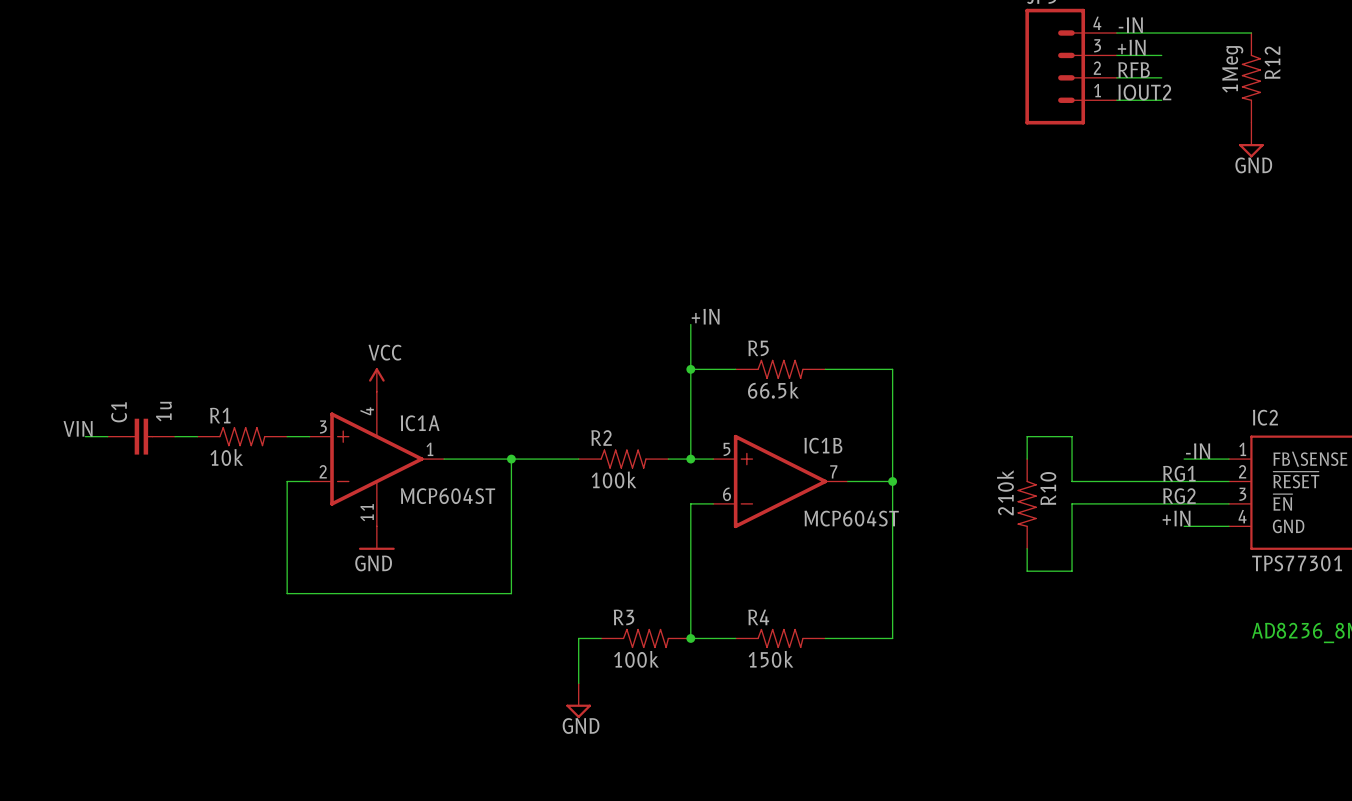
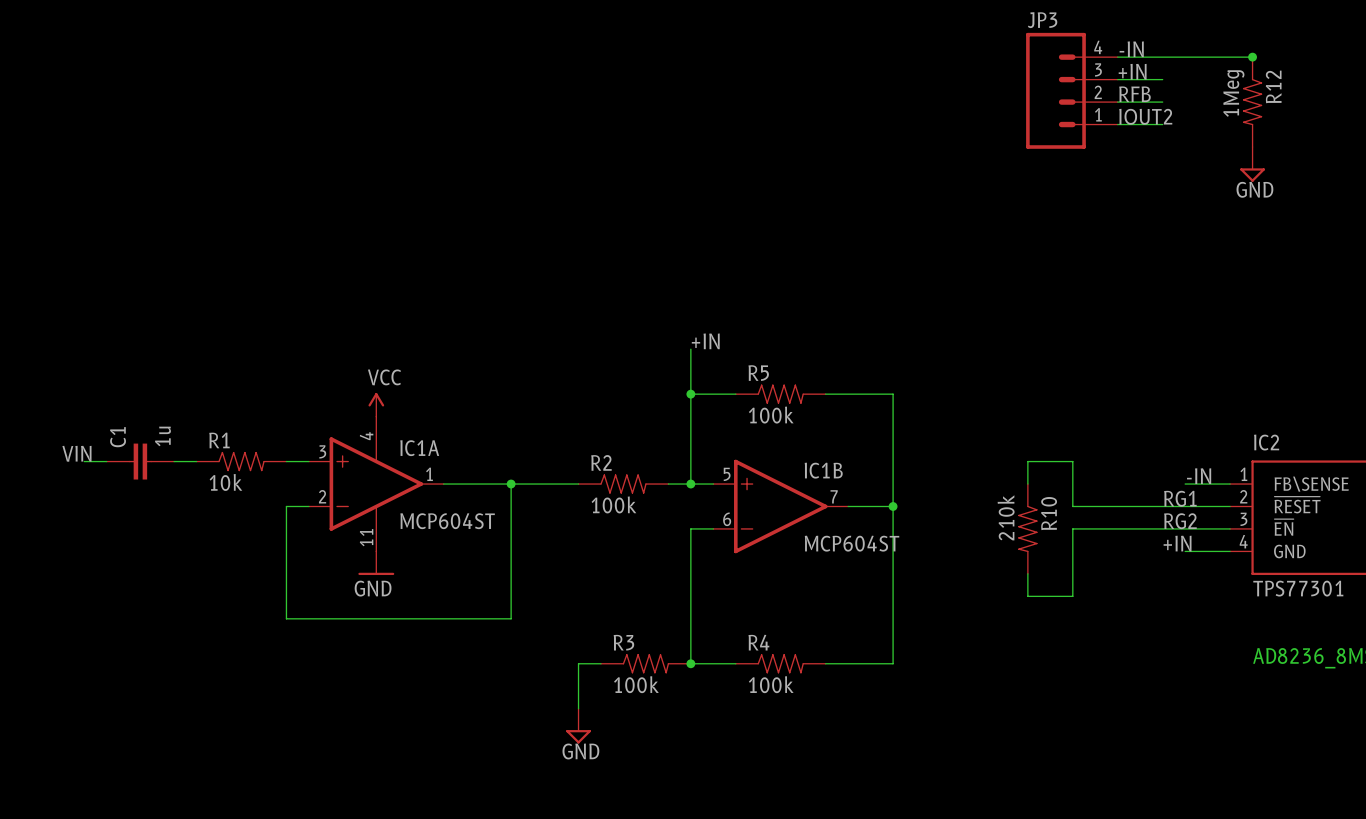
junction: none -> (1252, 57)
R5 value: 66.5k (773, 390) -> 100k (771, 415)
R4 value: 150k (771, 659) -> 100k (771, 684)

